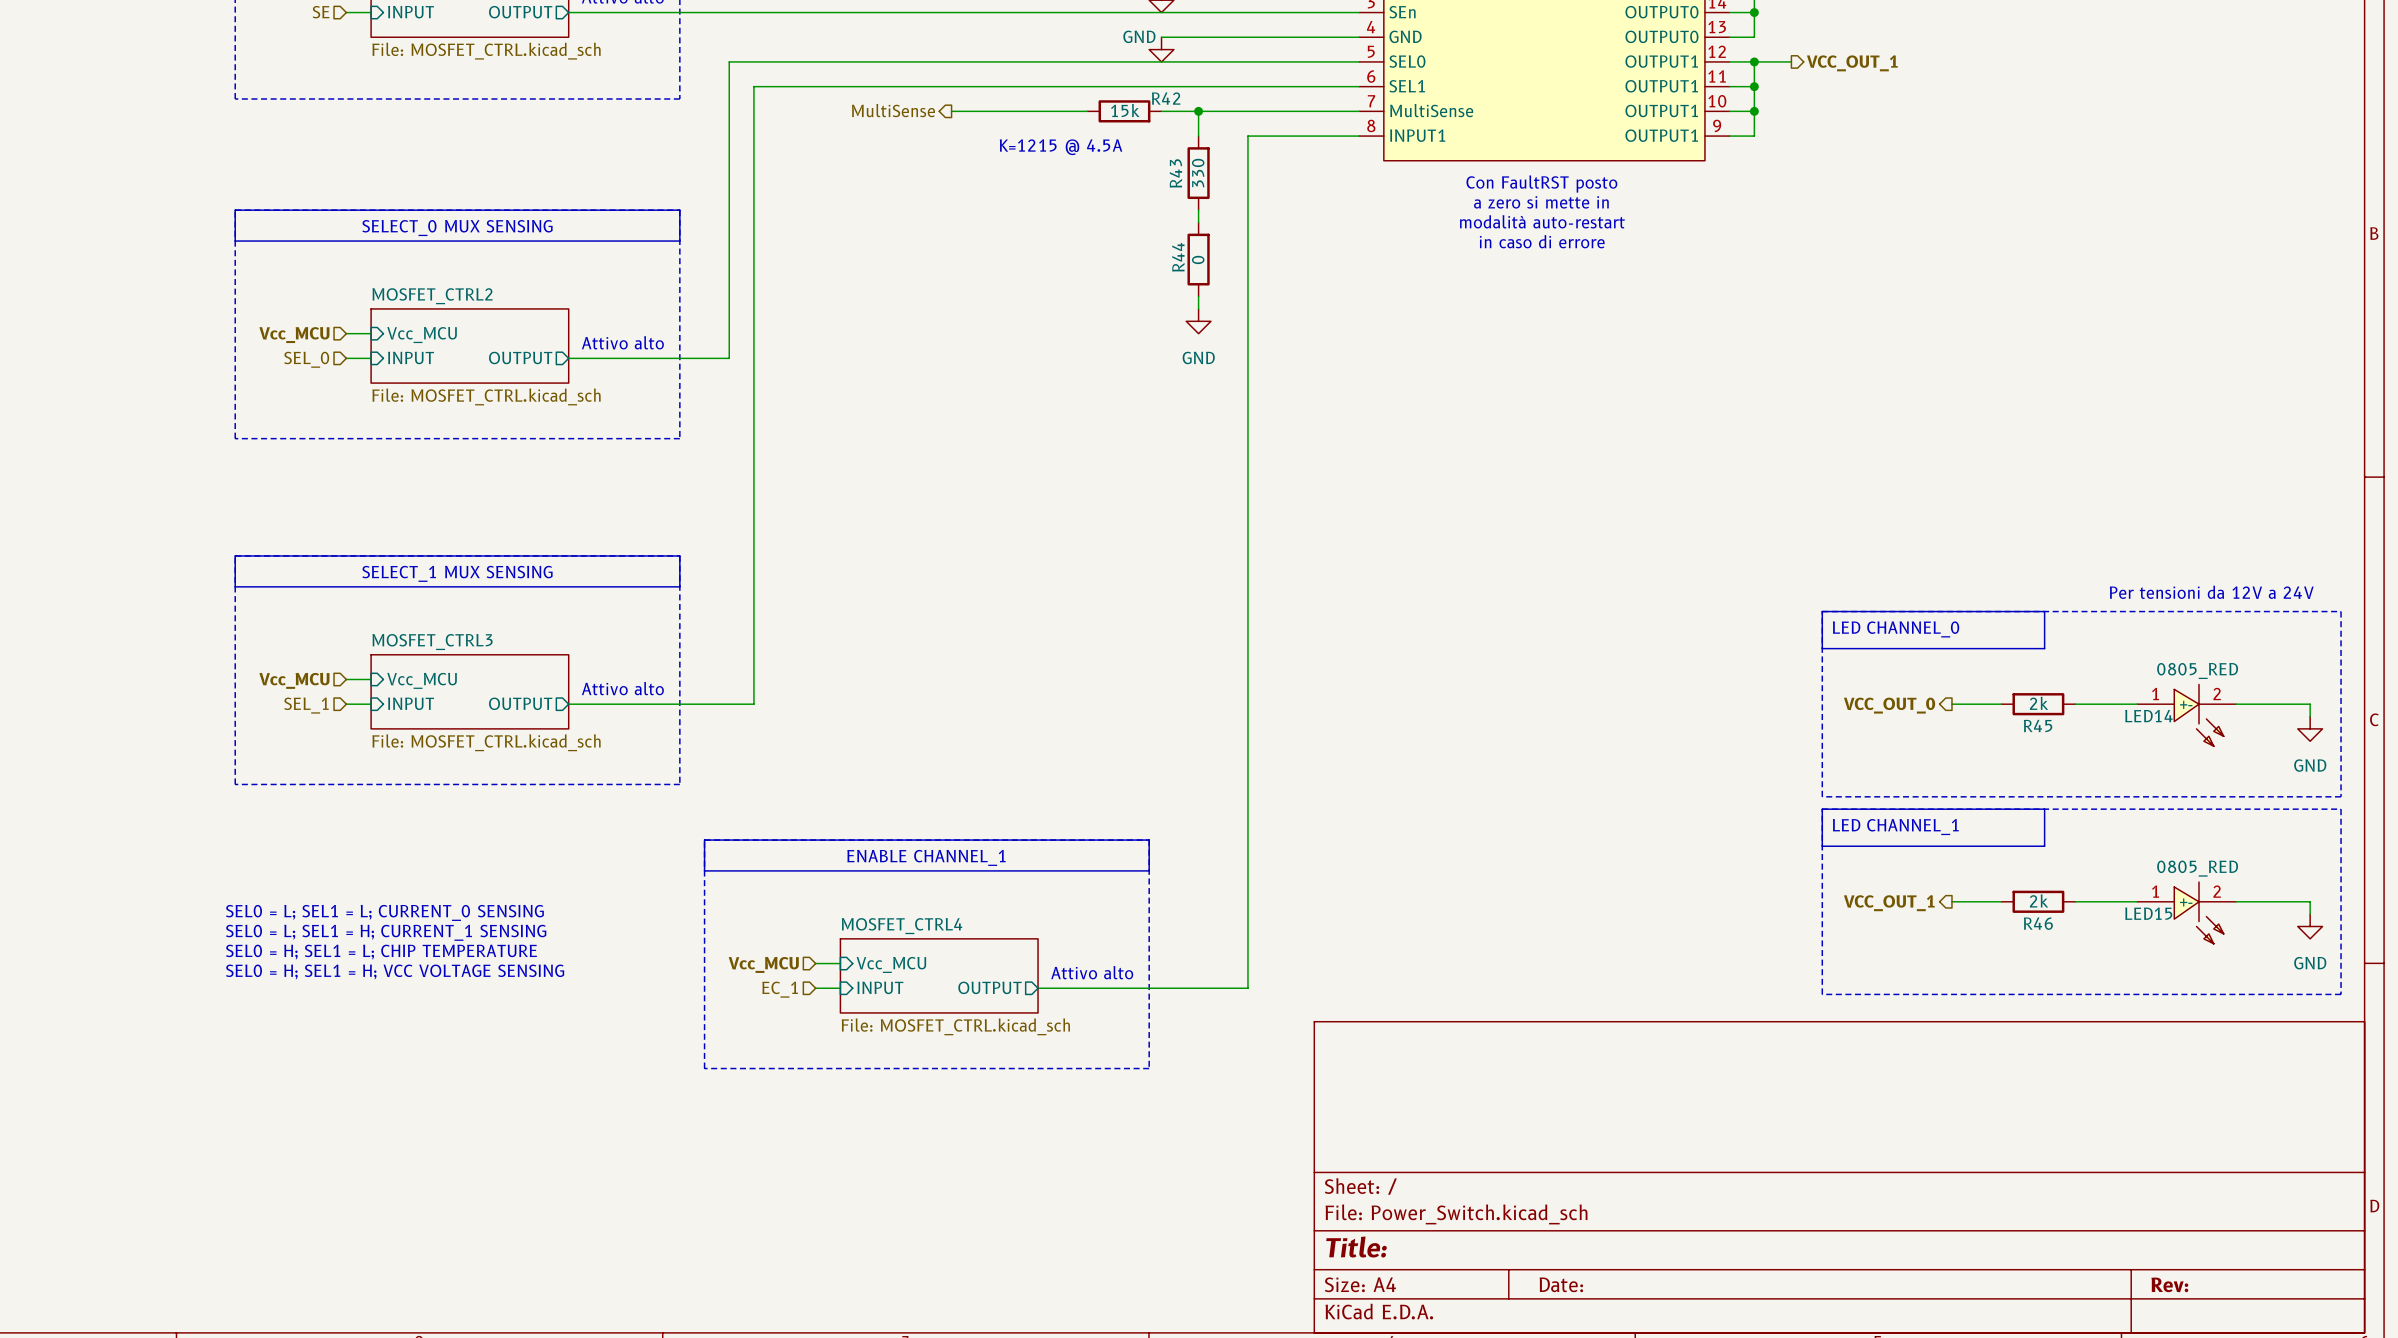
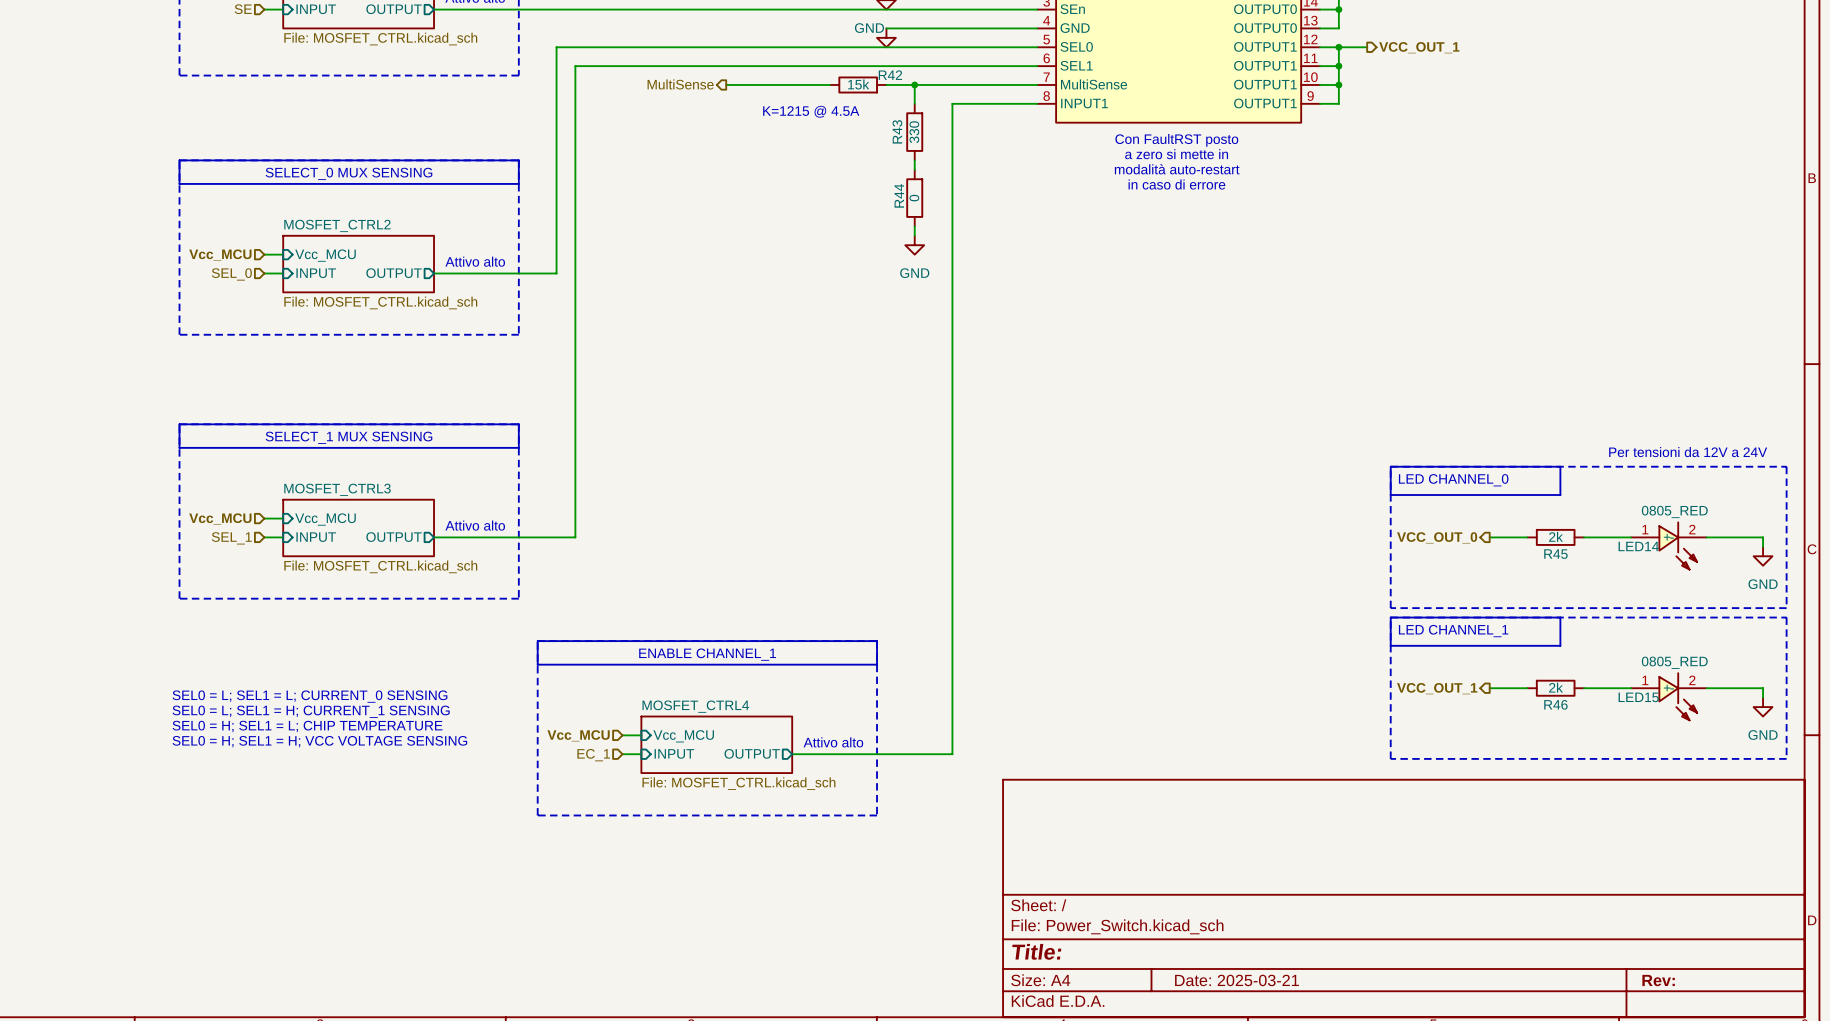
title block: Date: (1561, 1284) -> Date: 2025-03-21 (1236, 980)

